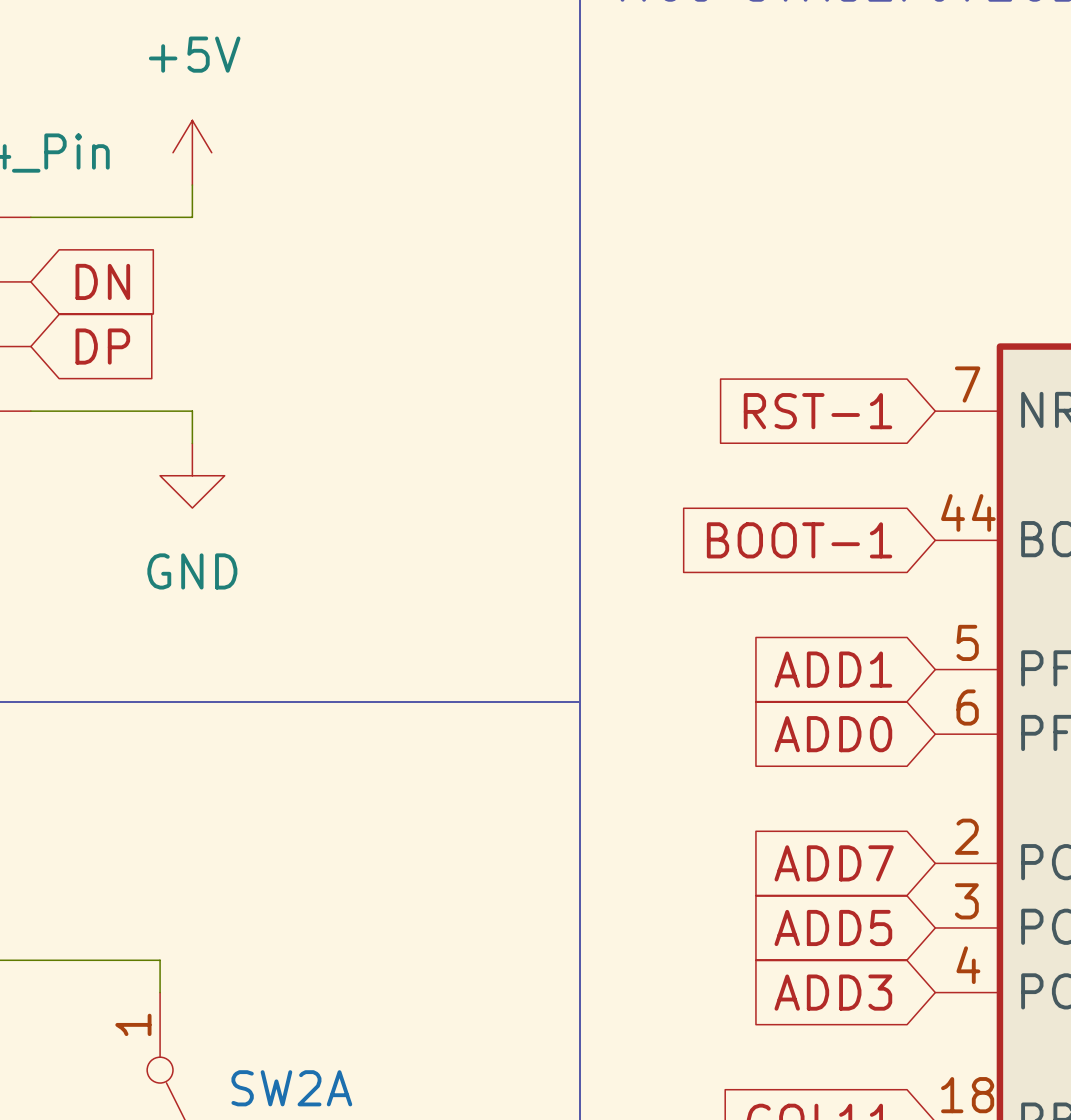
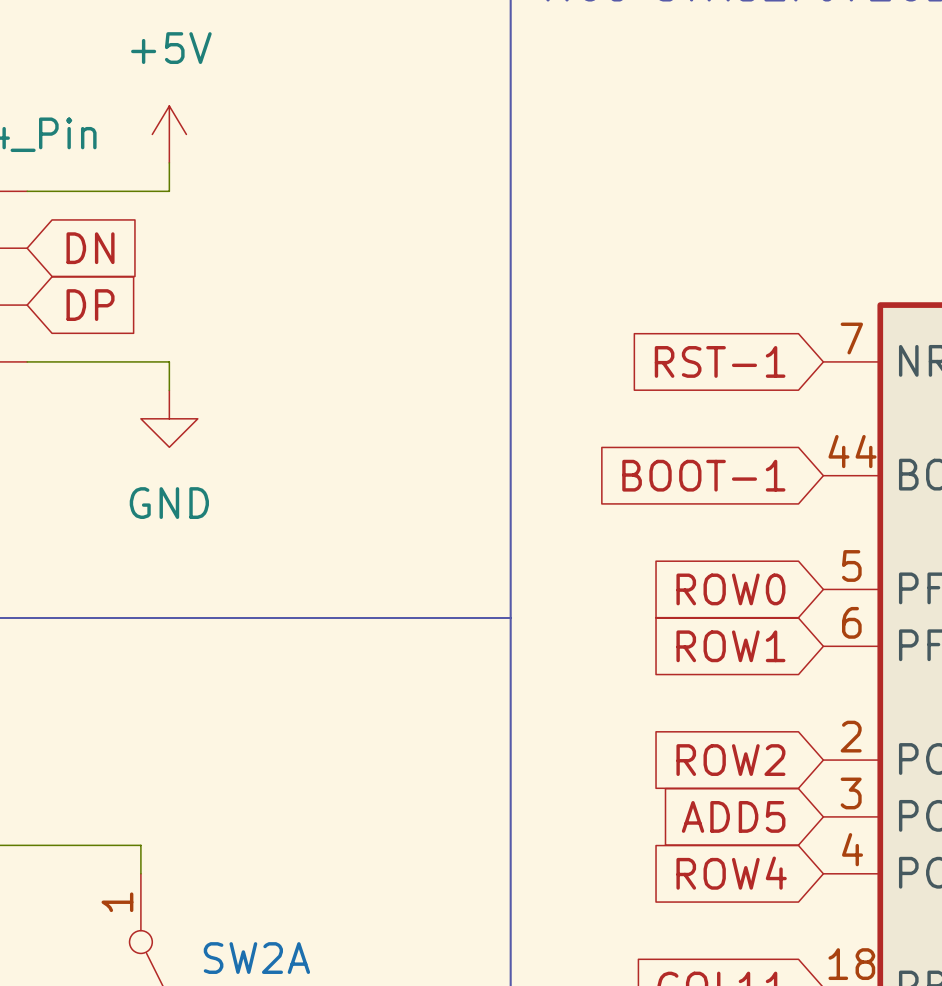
global label: ADD1 (833, 669) -> ROW0 (730, 589)
global label: ADD0 (833, 734) -> ROW1 (730, 646)
global label: ADD7 (834, 863) -> ROW2 (730, 760)
global label: ADD3 (833, 992) -> ROW4 (731, 873)

